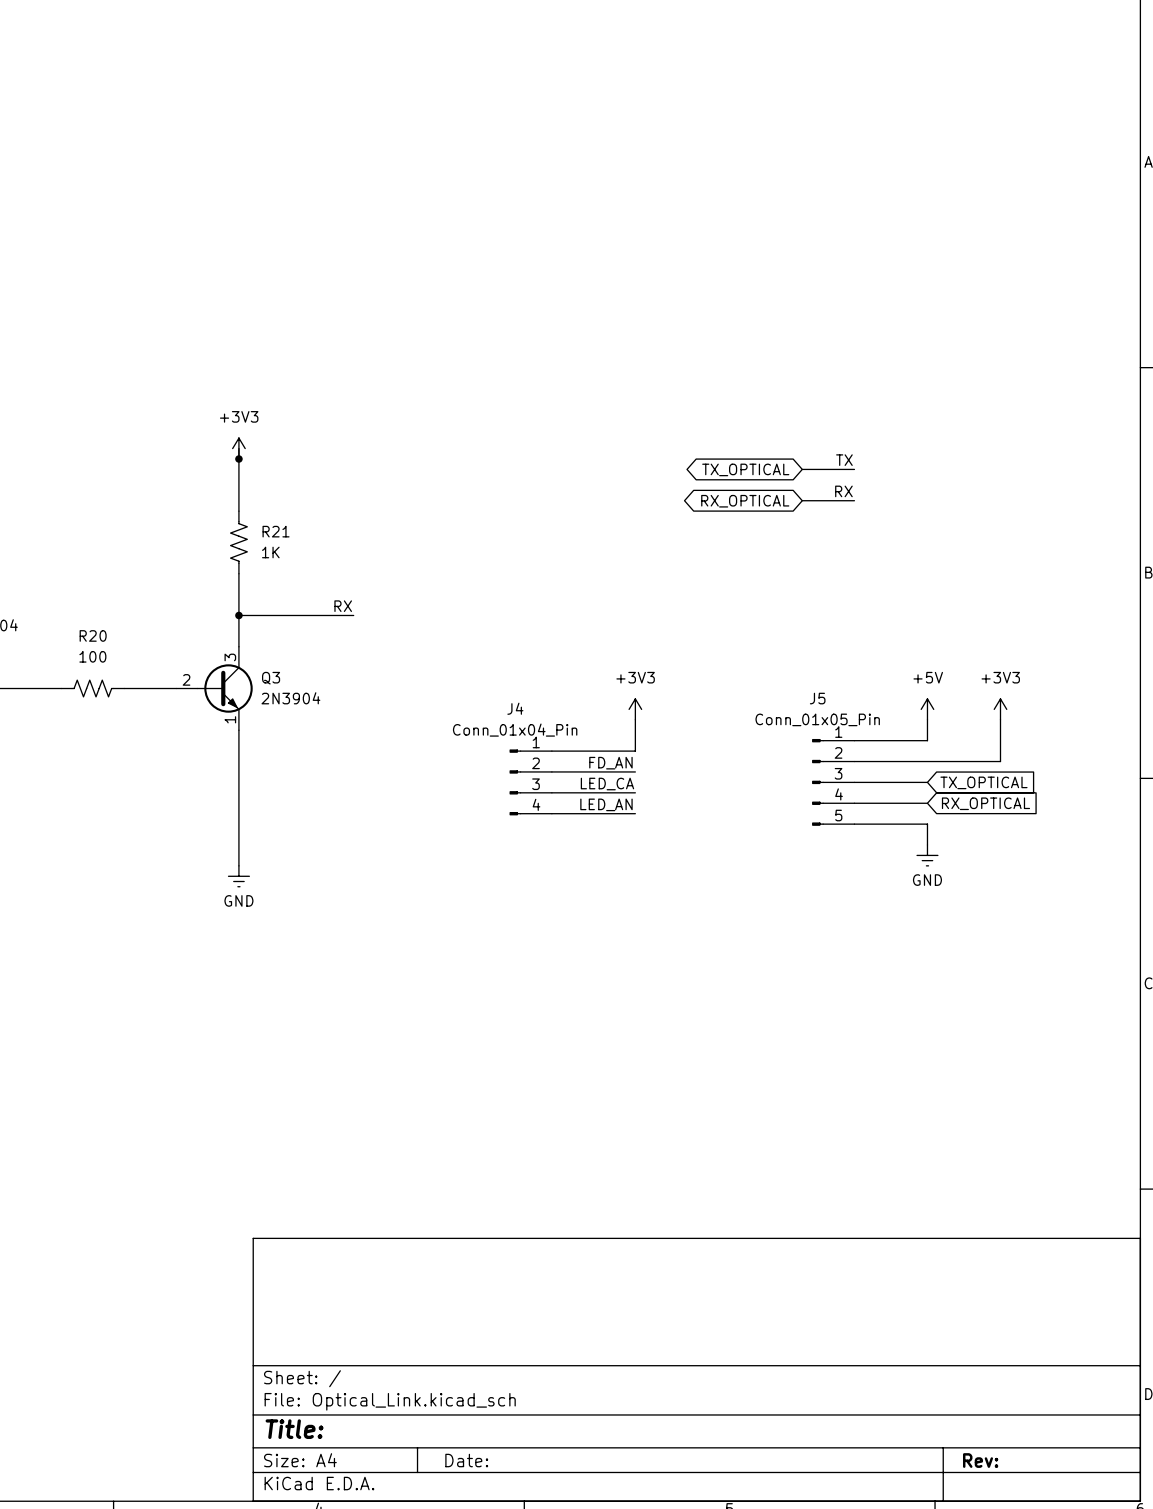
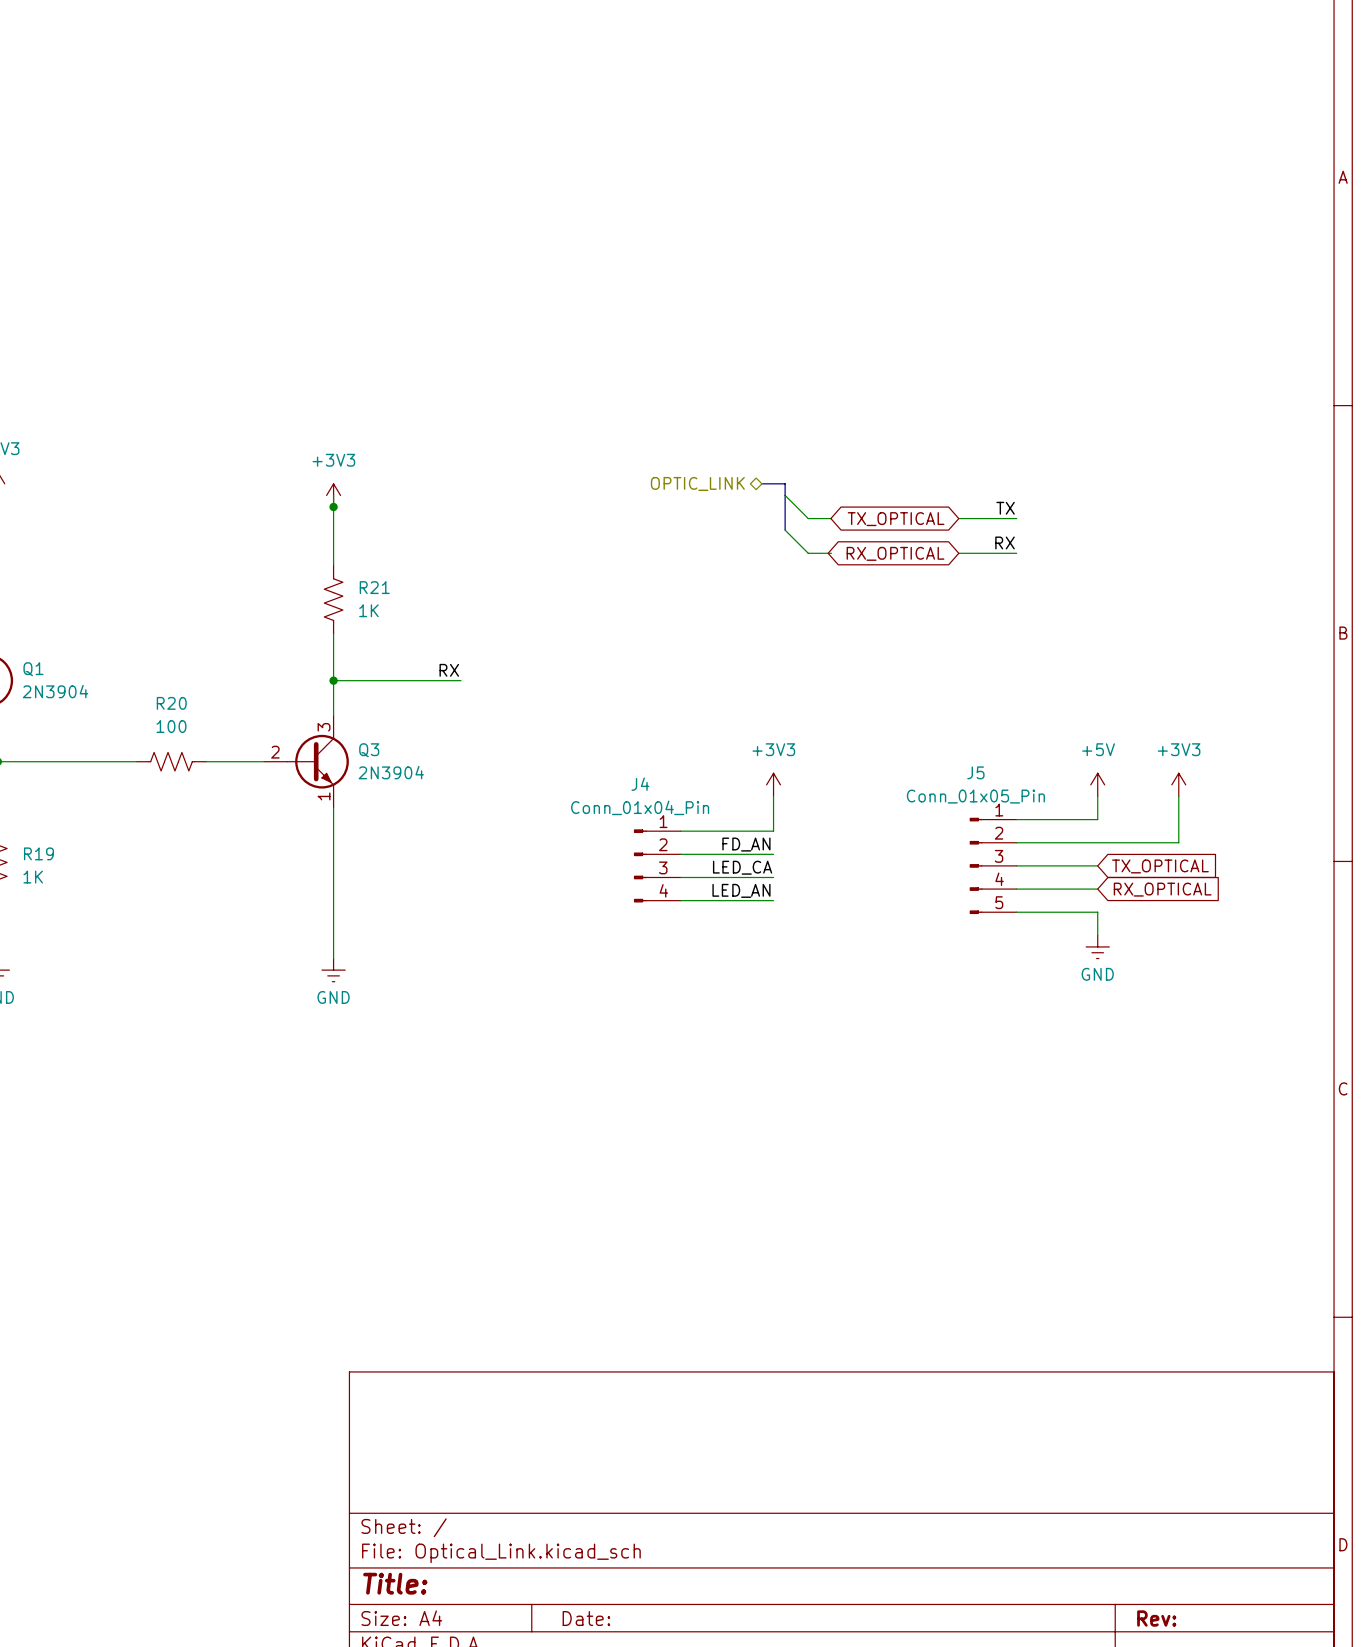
hierarchical label: none -> OPTIC_LINK (697, 483)
bus: none -> (761, 483) (785, 483) (785, 530)
wire: none -> (785, 495) (808, 518) (831, 518)
wire: none -> (785, 530) (808, 553) (831, 553)

